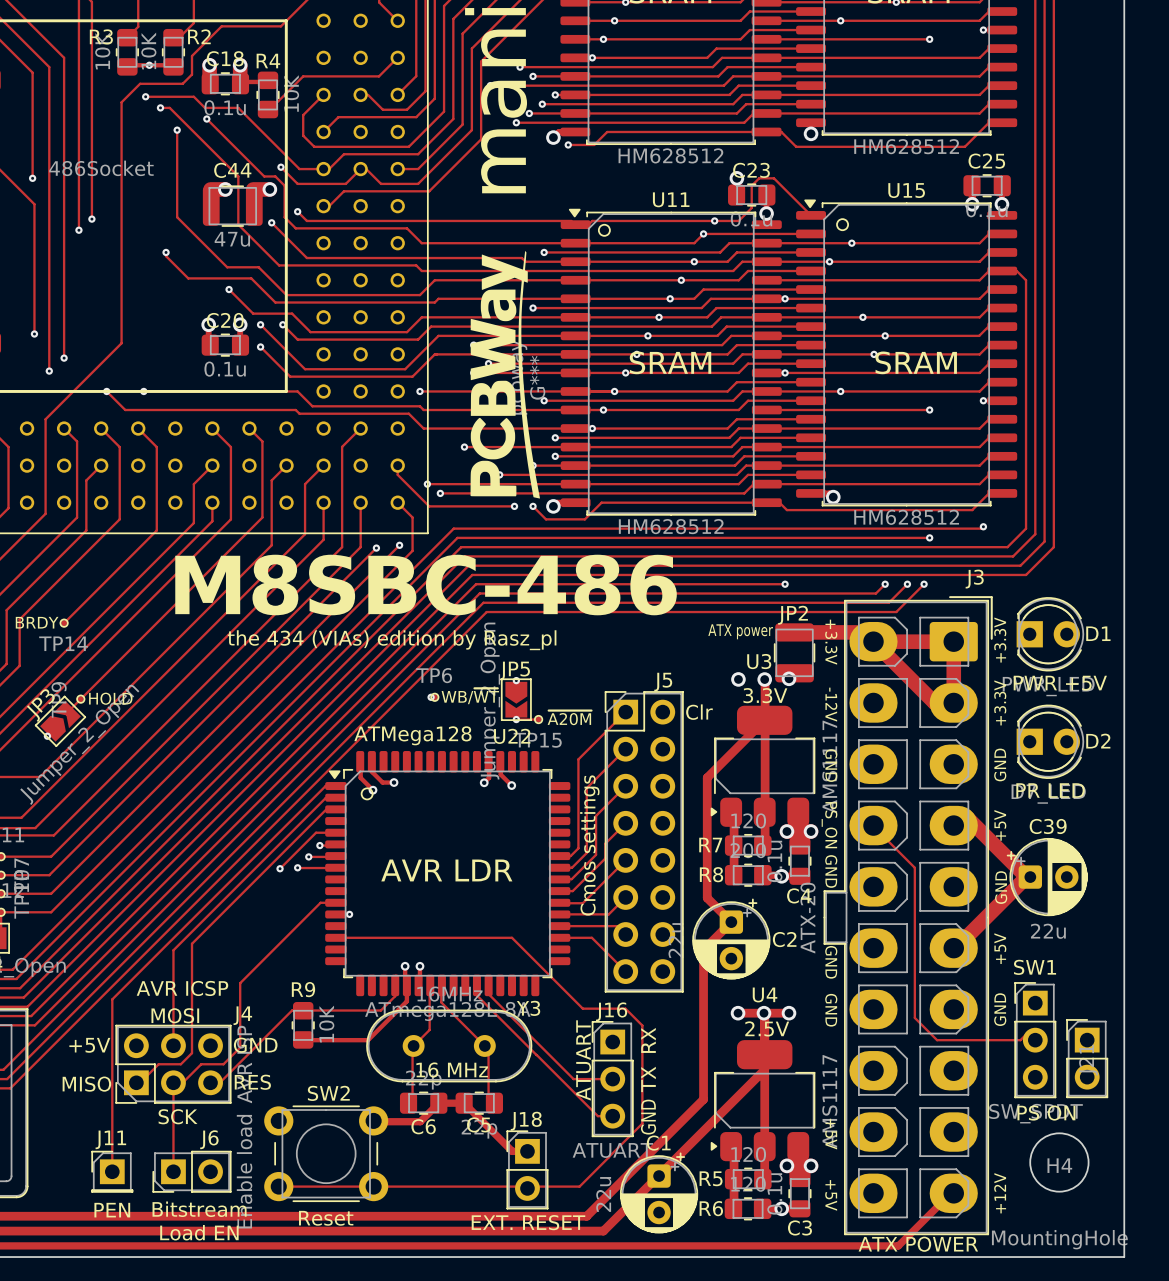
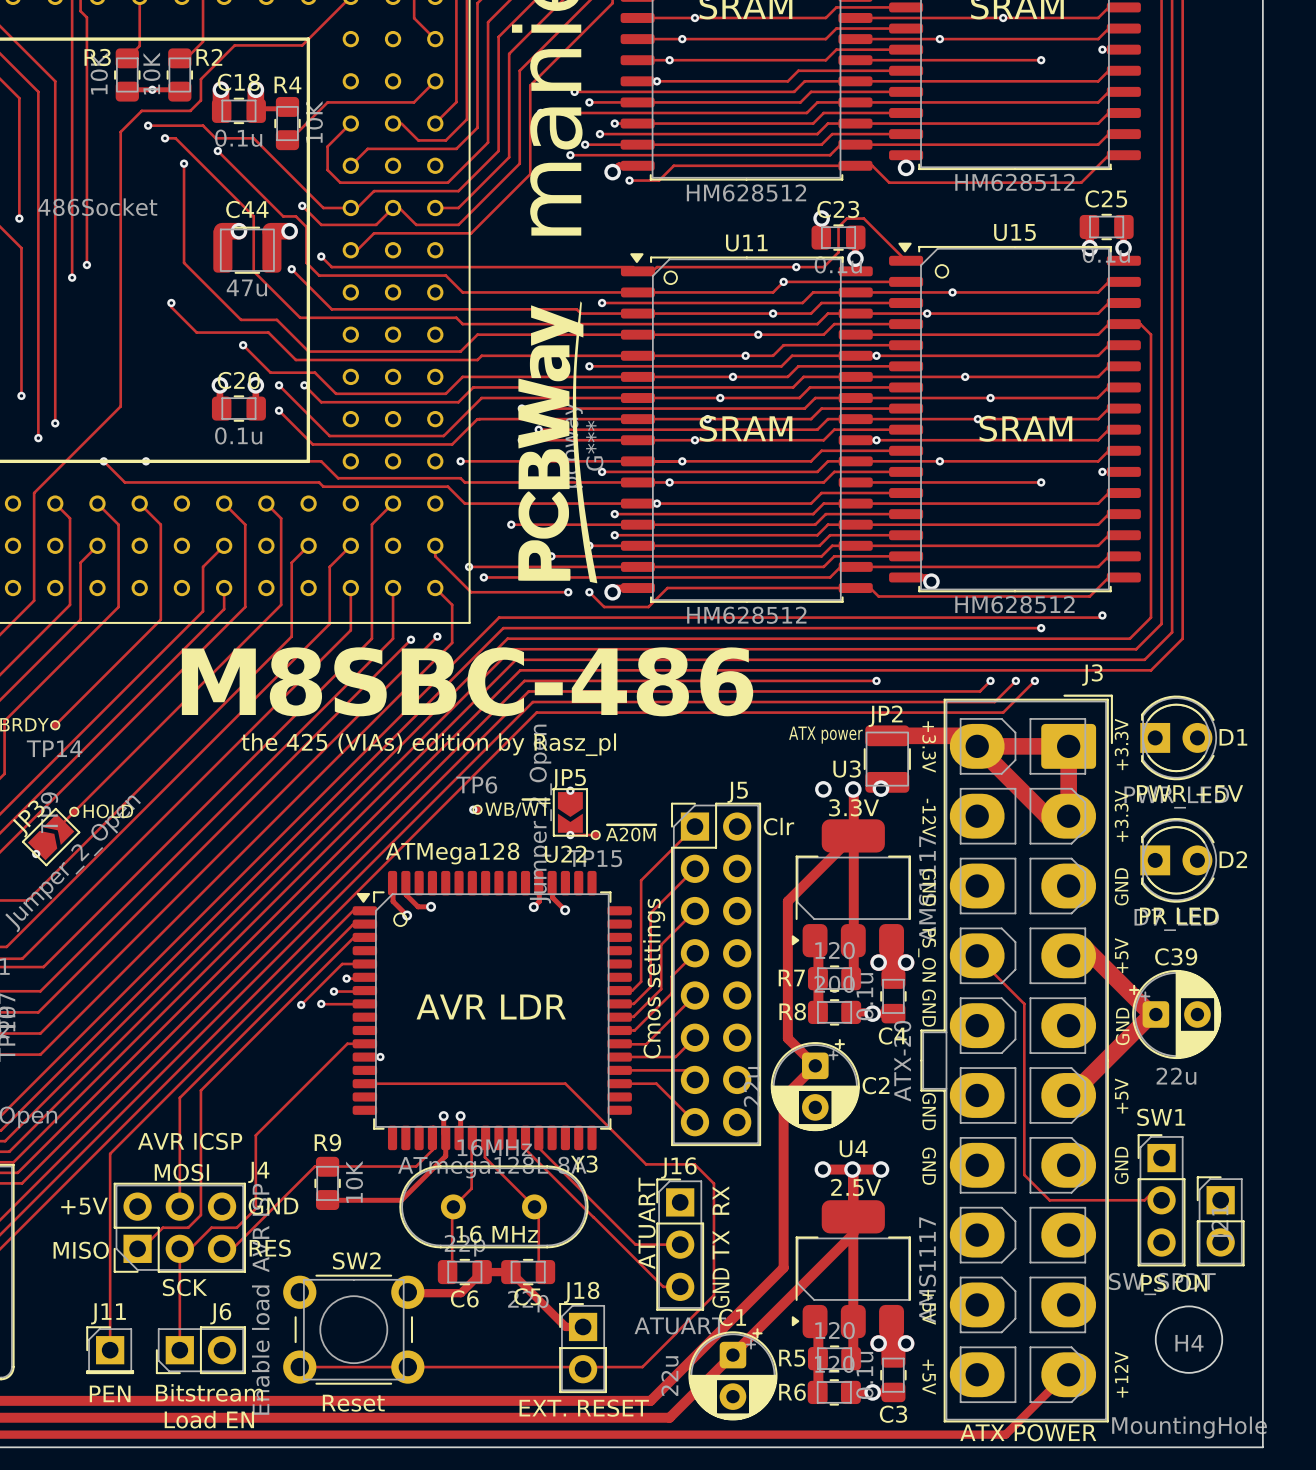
text: the 434 (VIAs) edition by Rasz_pl (392, 640) -> the 425 (VIAs) edition by Rasz_pl (428, 744)

